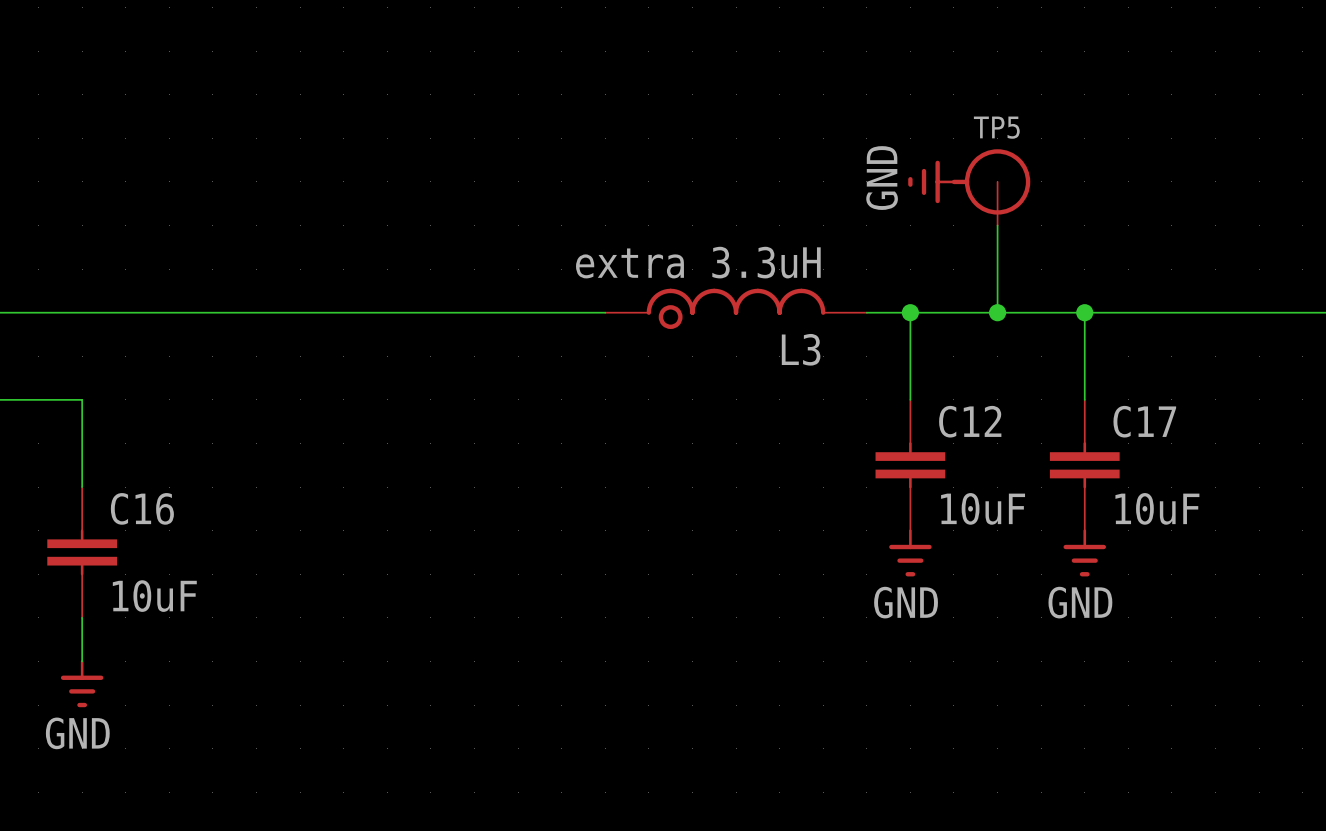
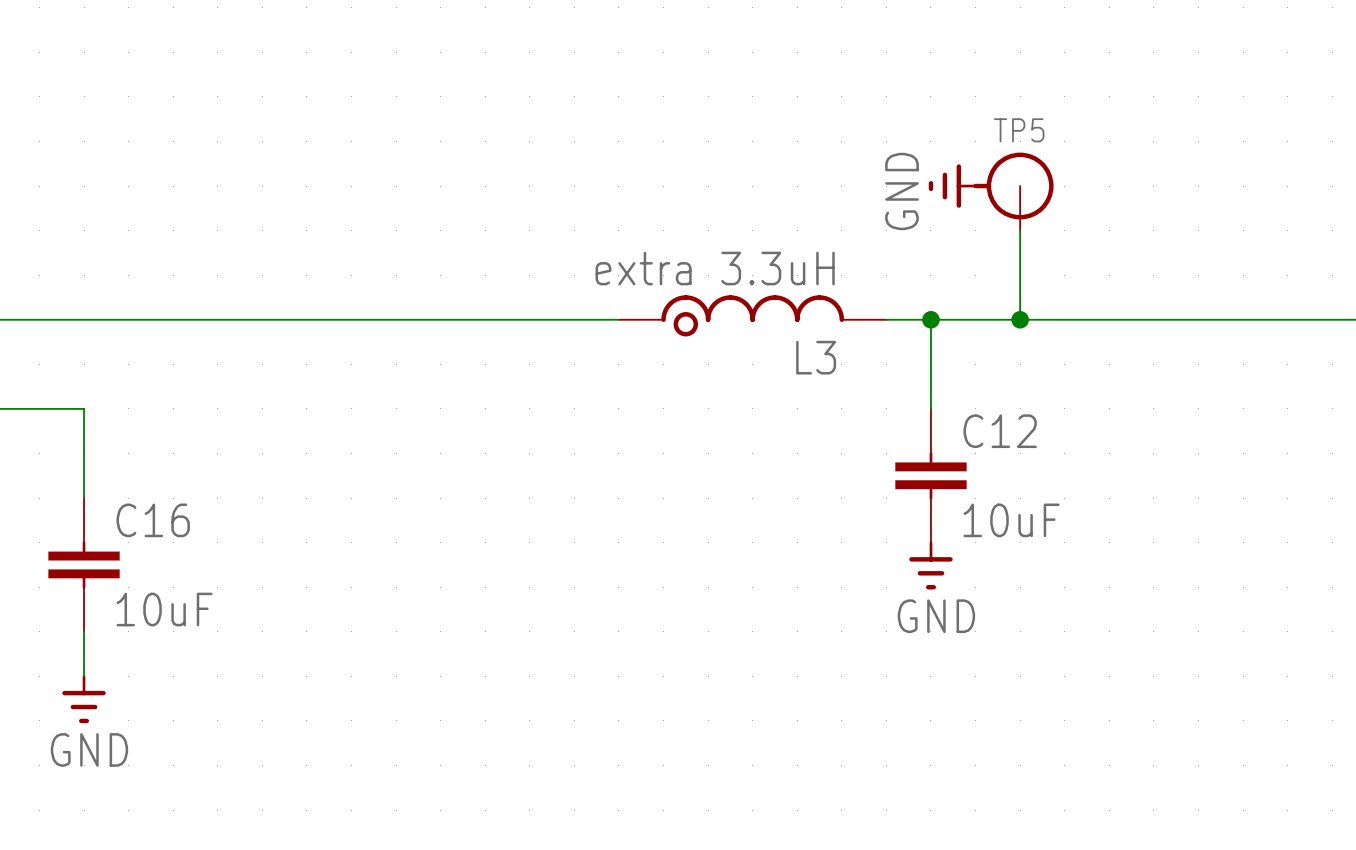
wire: (1084, 312) (1084, 399) -> none
junction: (1084, 312) -> none
C17: 10uF (1084, 465) -> none
power symbol: GND (1084, 552) -> none

